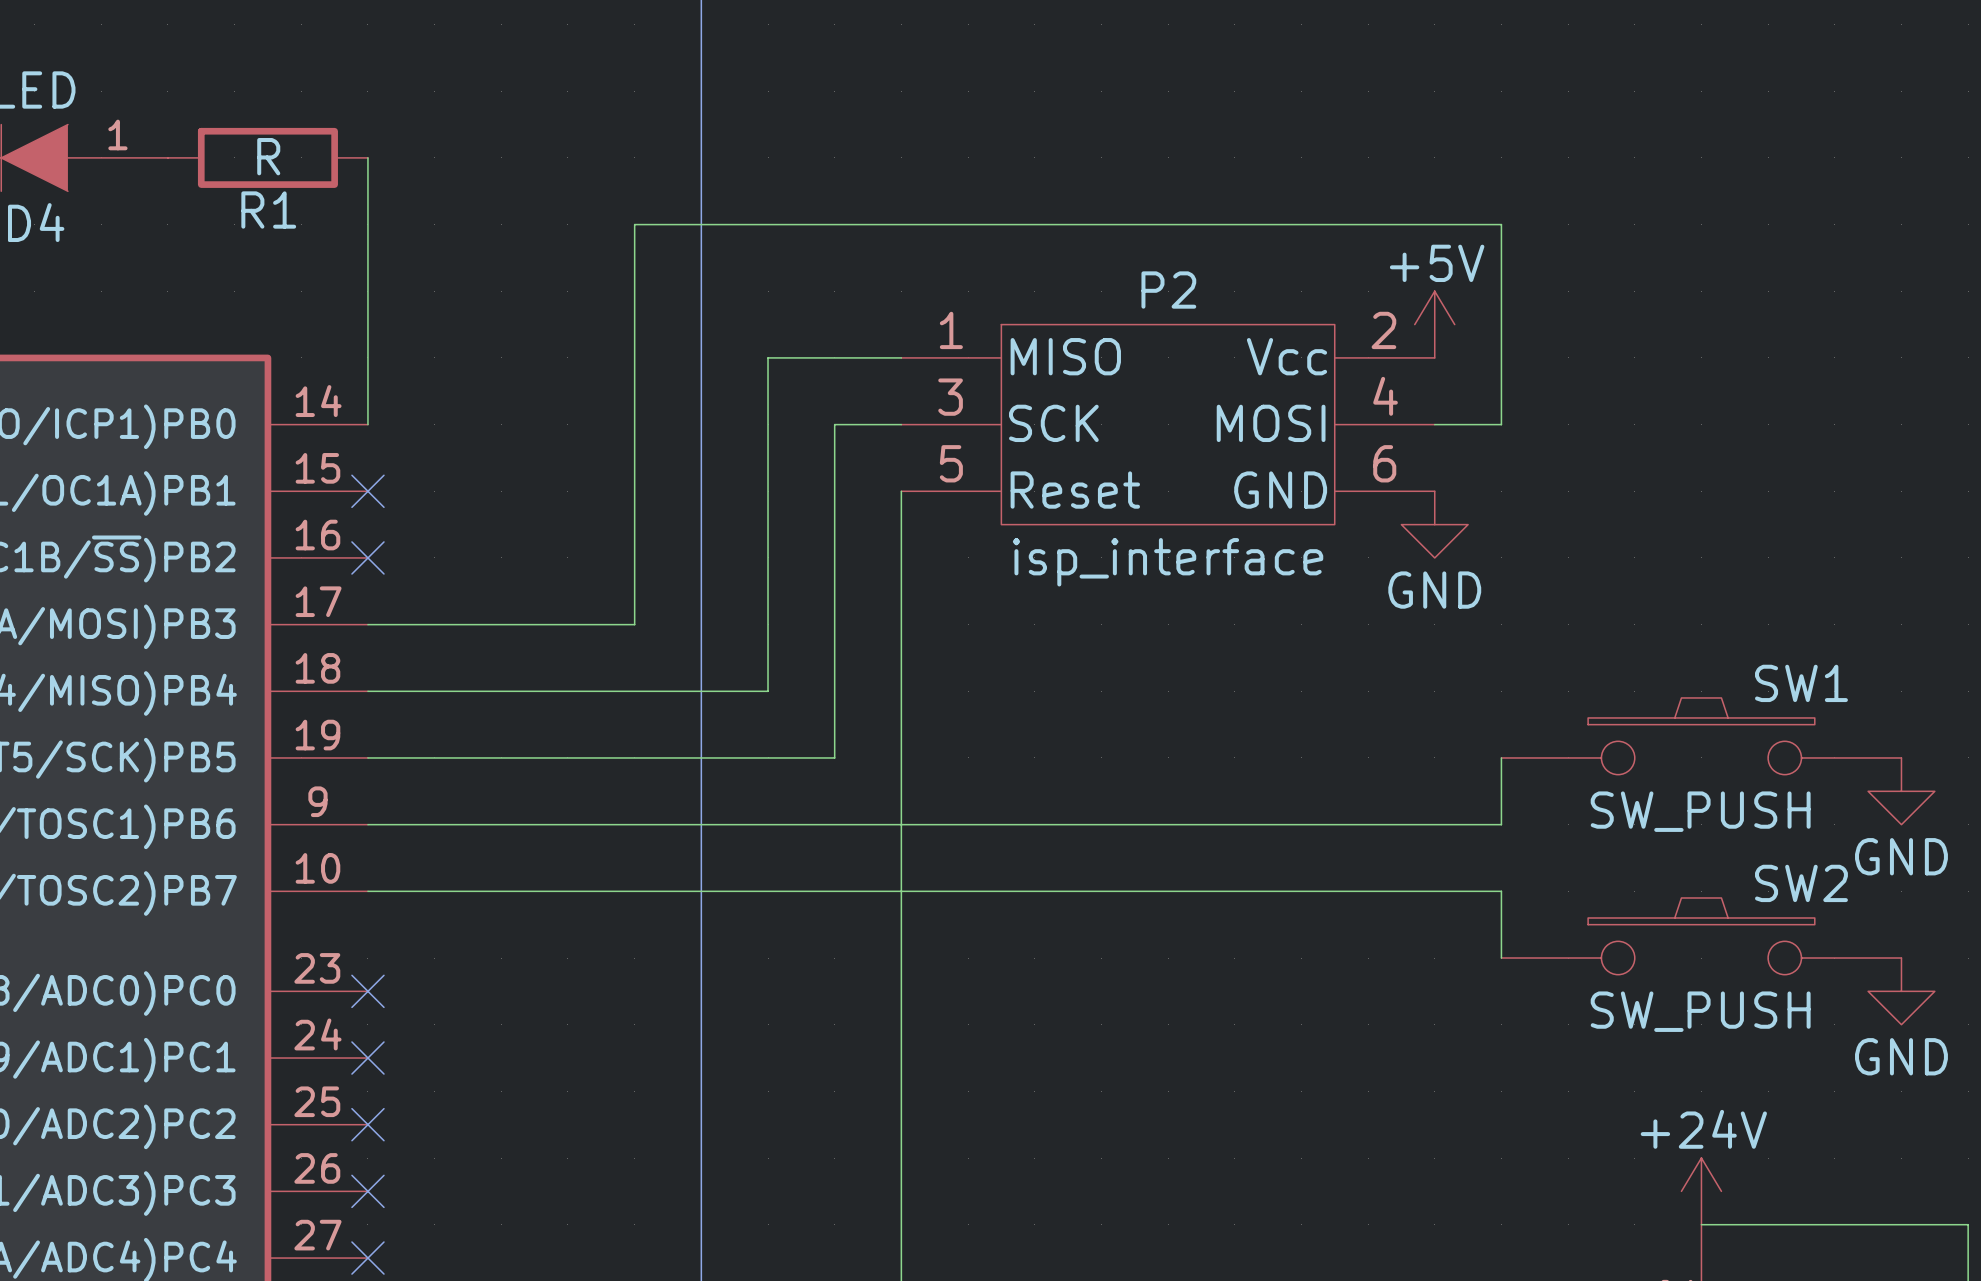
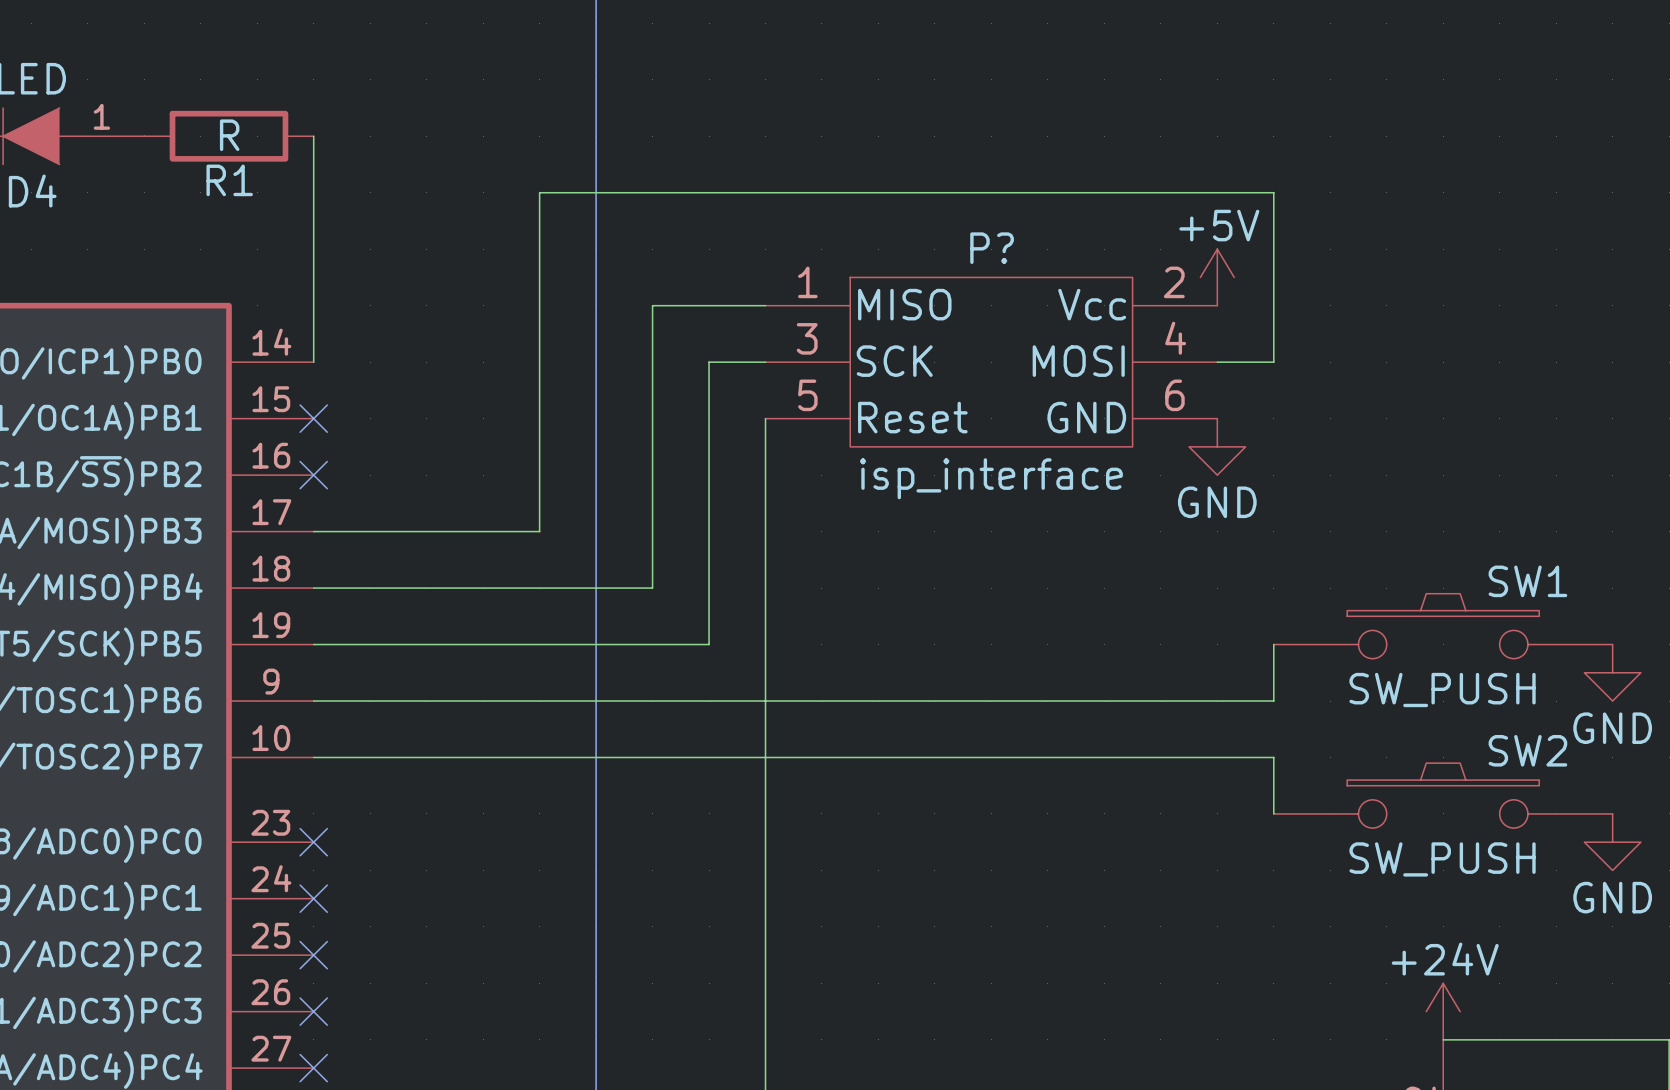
P2 name: P2 (1168, 290) -> P? (992, 248)

